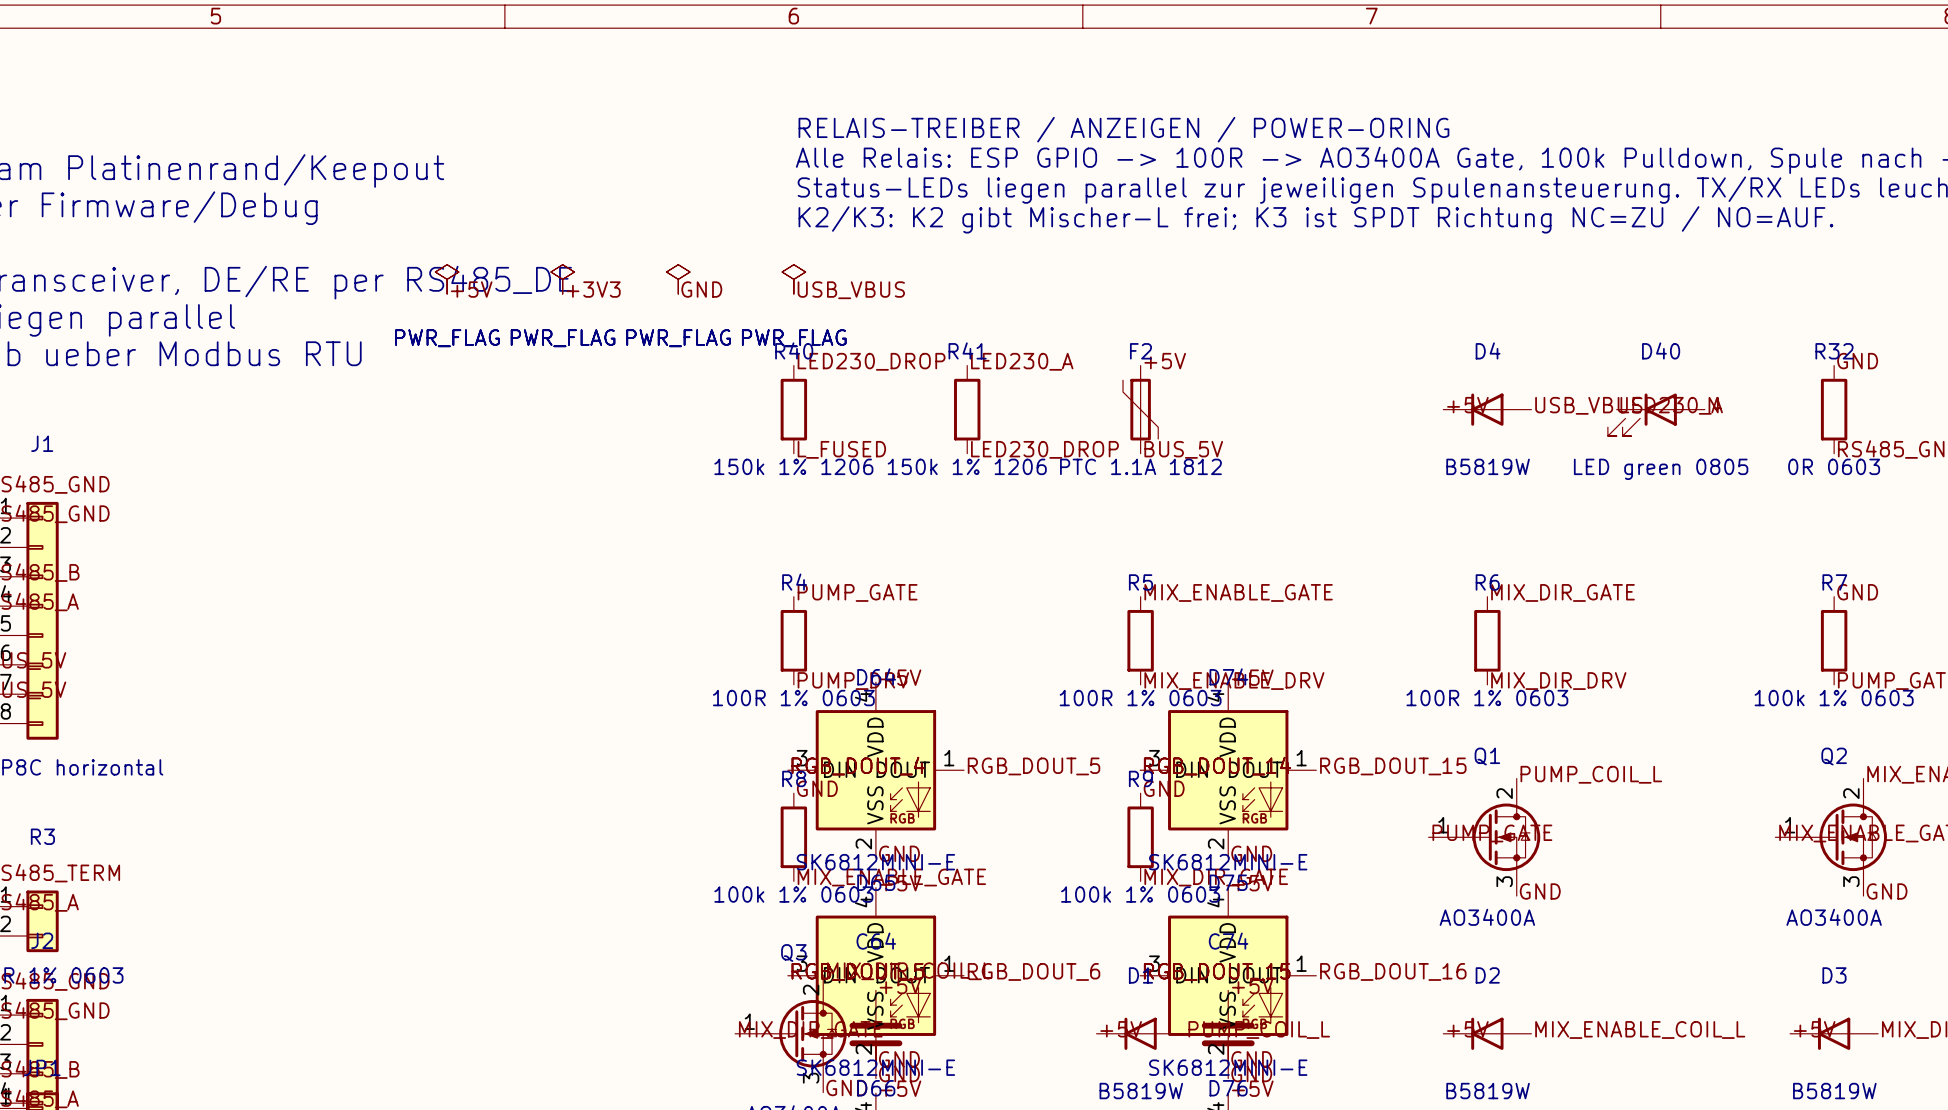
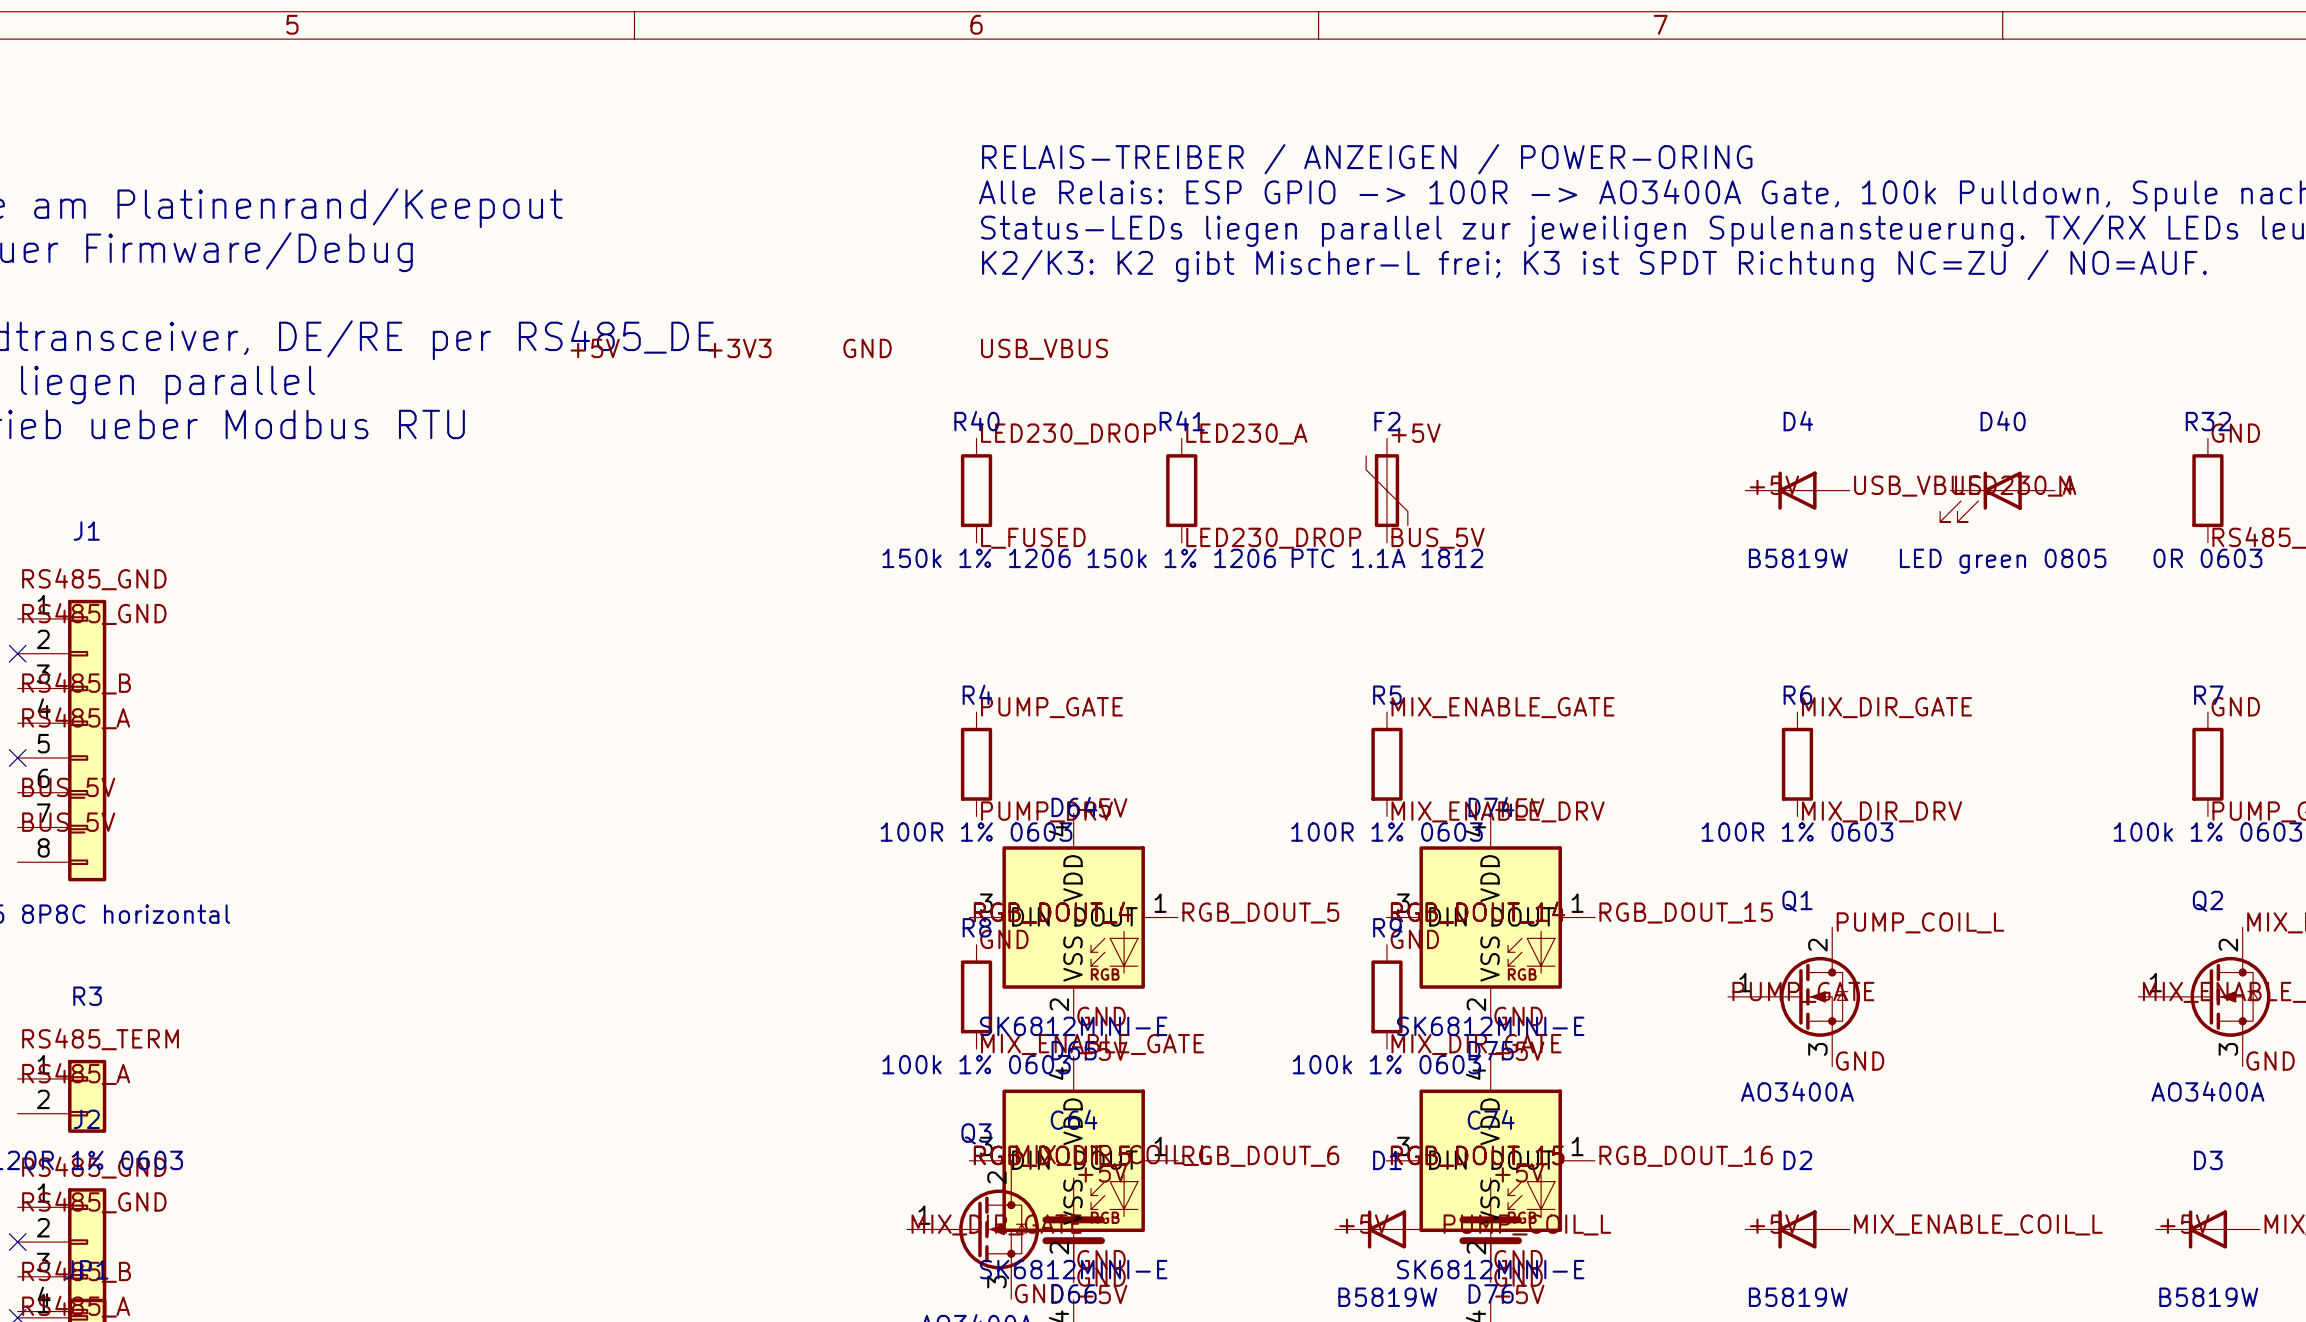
power symbol: PWR_FLAG (447, 279) -> none
power symbol: PWR_FLAG (562, 279) -> none
power symbol: PWR_FLAG (678, 279) -> none
power symbol: PWR_FLAG (793, 279) -> none

